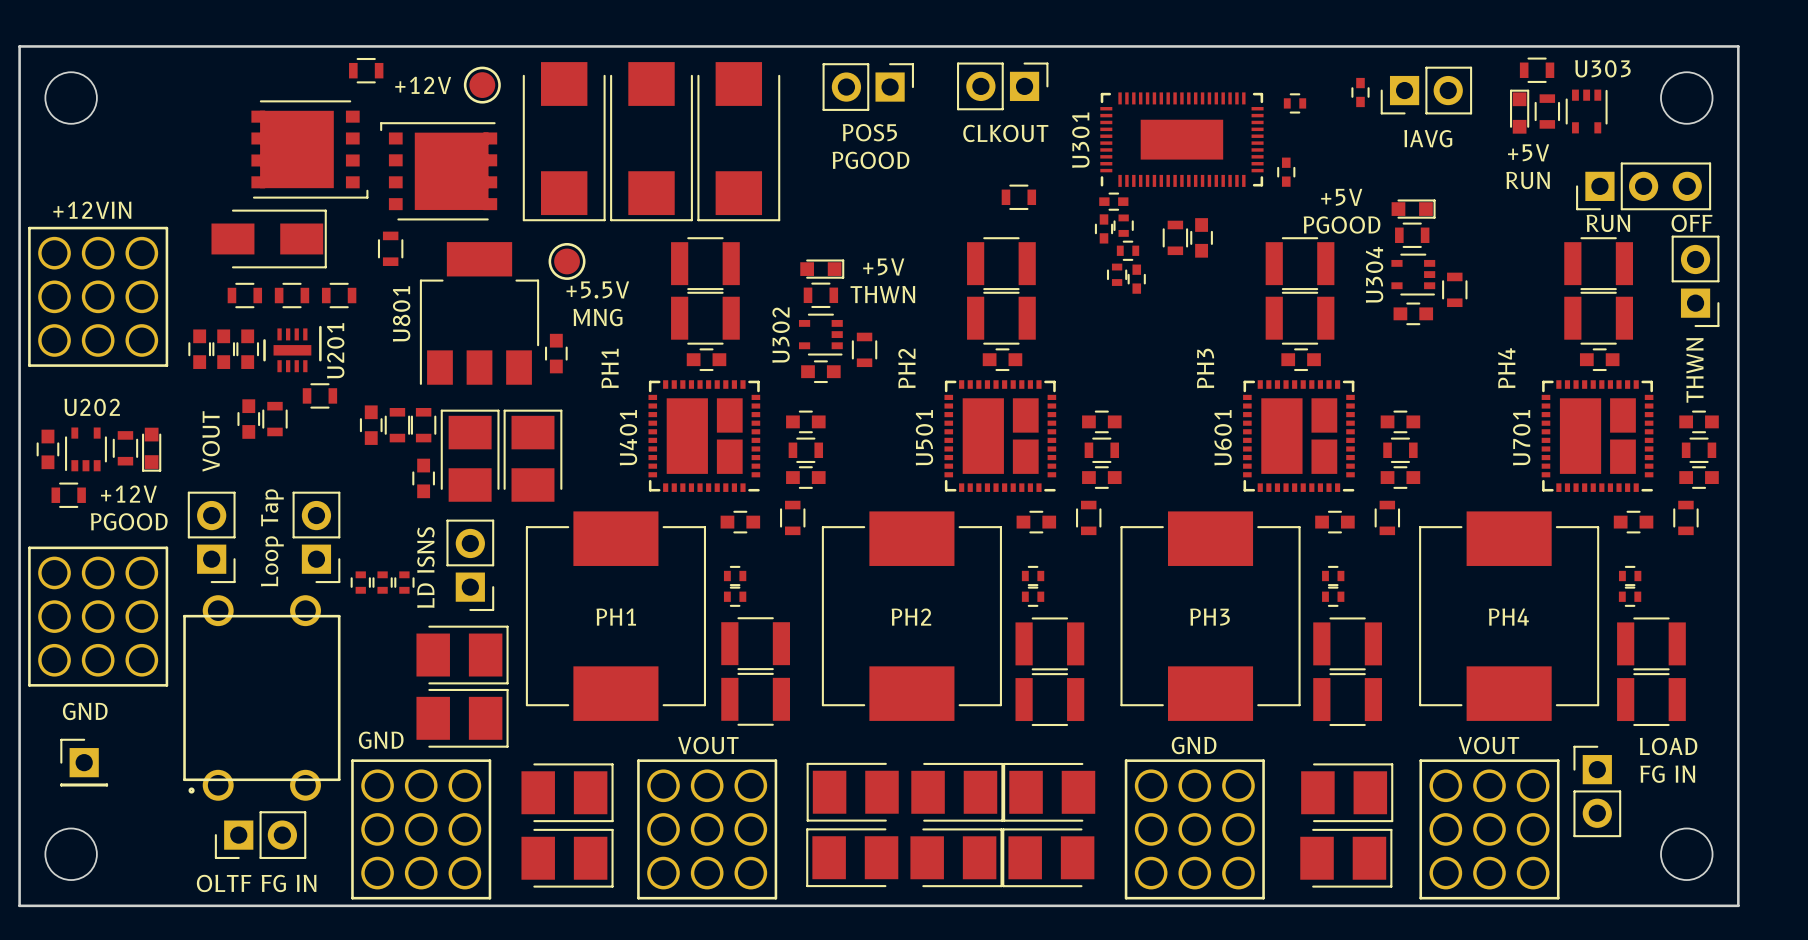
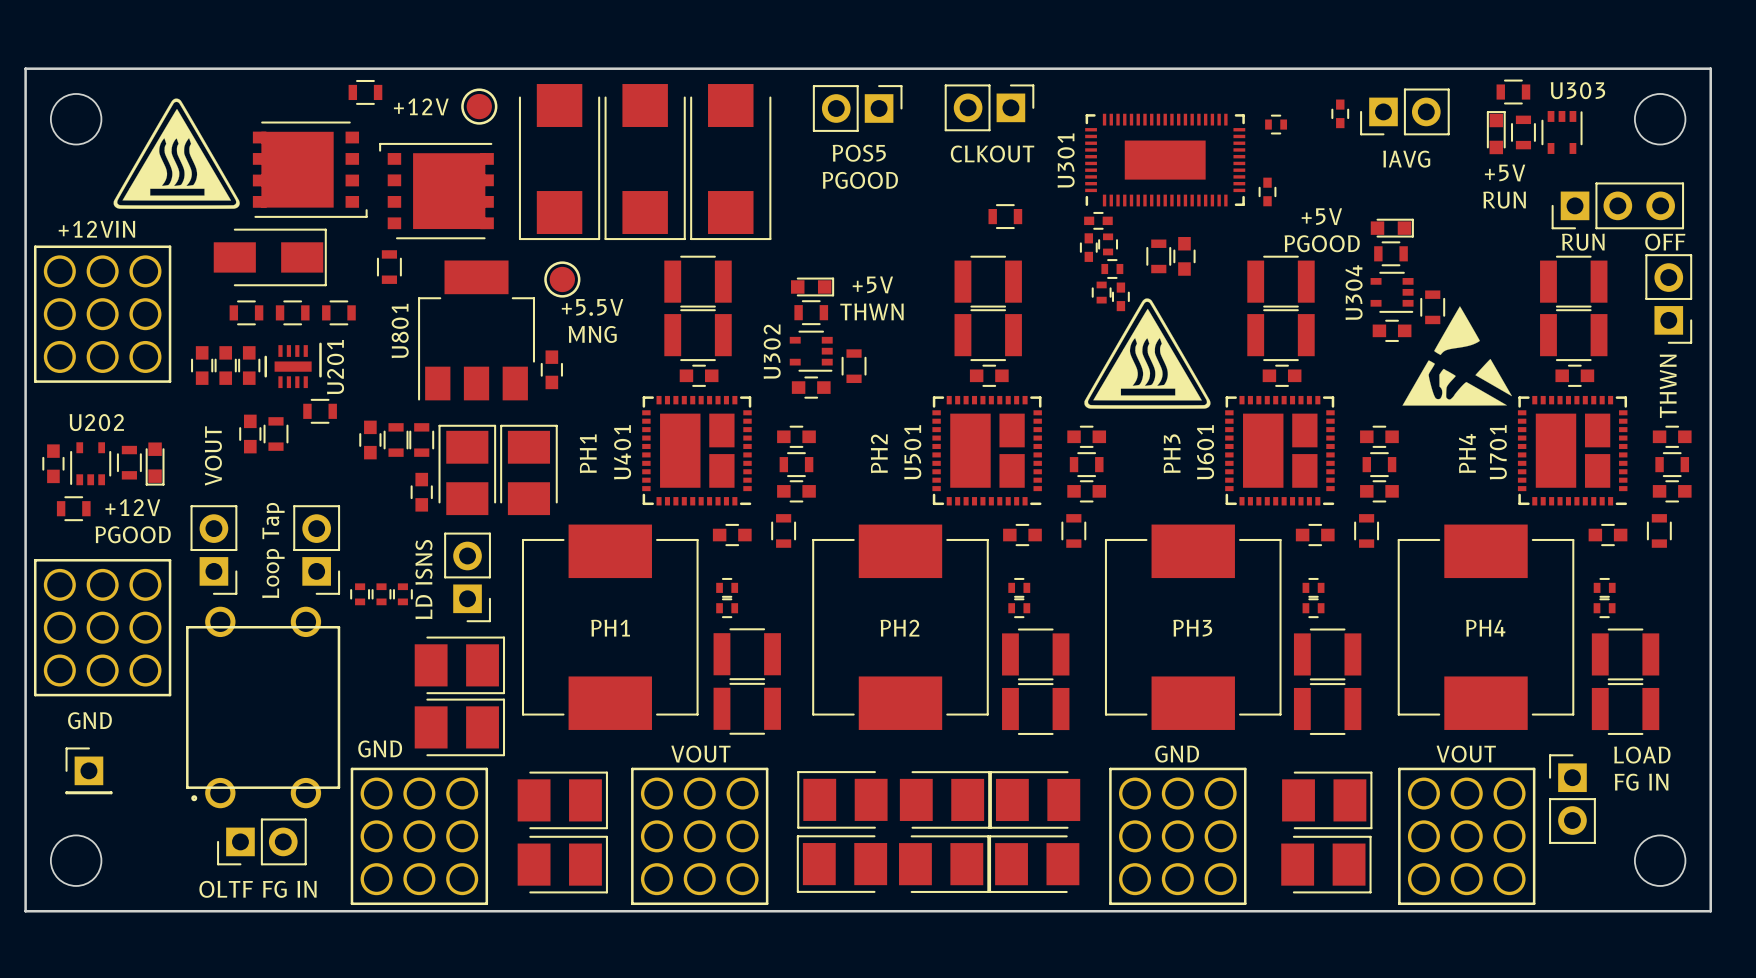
drawing: none -> [113, 98, 240, 209]
drawing: none -> [1084, 298, 1211, 409]
drawing: none -> [1402, 306, 1512, 406]
text position: PH1 (610, 368) -> PH1 (588, 453)
text position: PH2 (906, 368) -> PH2 (879, 453)
text position: PH3 (1205, 368) -> PH3 (1172, 453)
text position: PH4 (1506, 368) -> PH4 (1467, 453)

